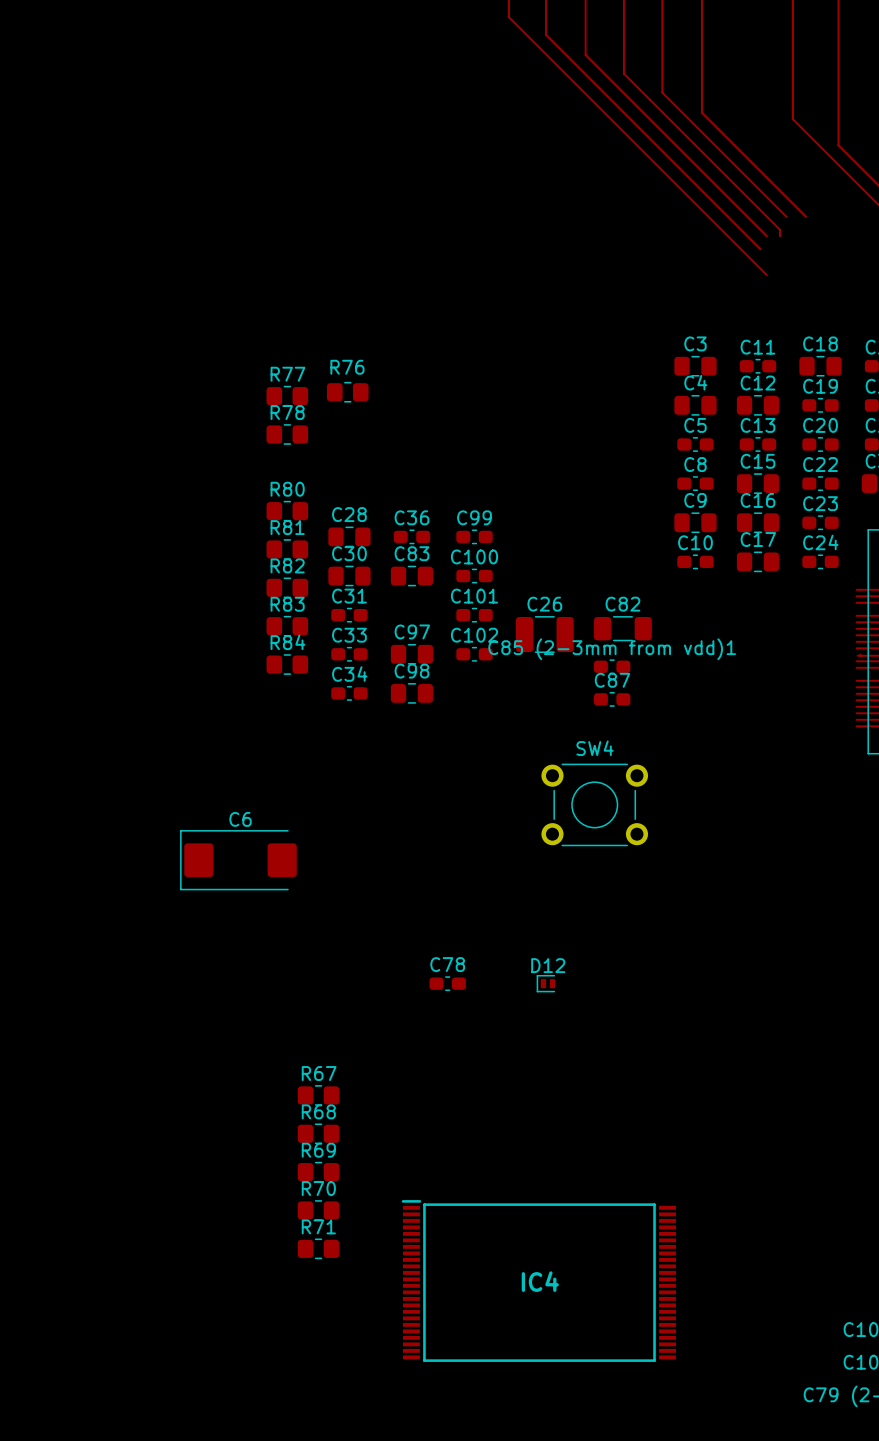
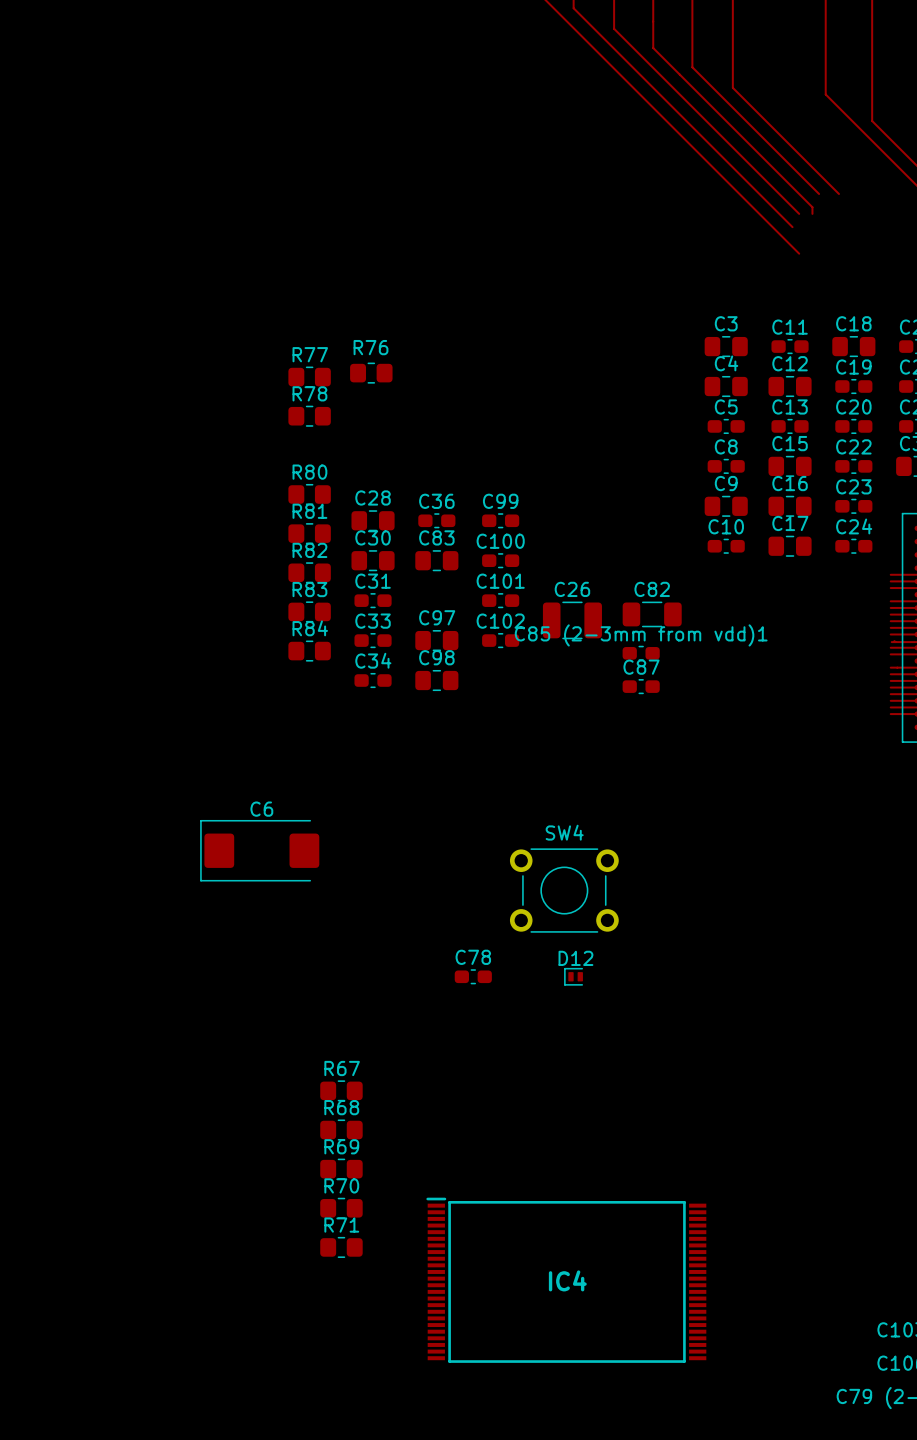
SW4 position: (594, 804) -> (564, 890)

